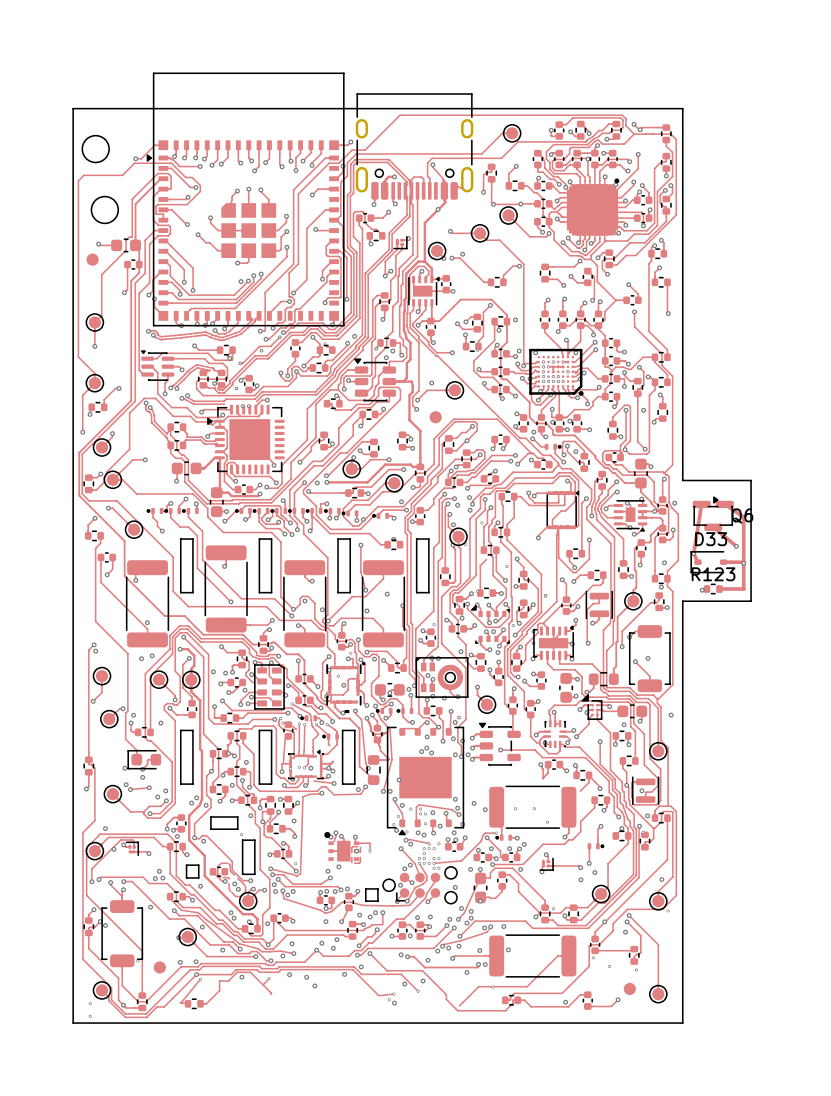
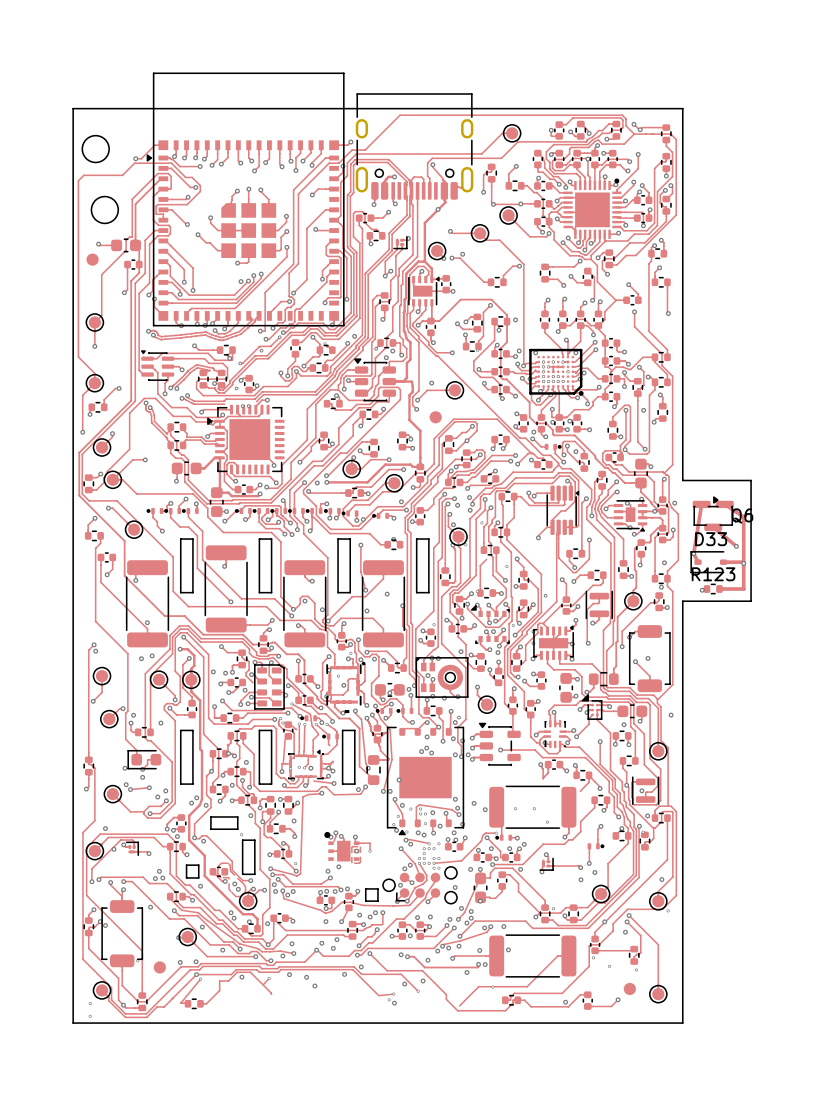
part footprint: [566, 178, 620, 236] -> [563, 178, 622, 239]
part footprint: [546, 490, 580, 530] -> [546, 485, 580, 535]

